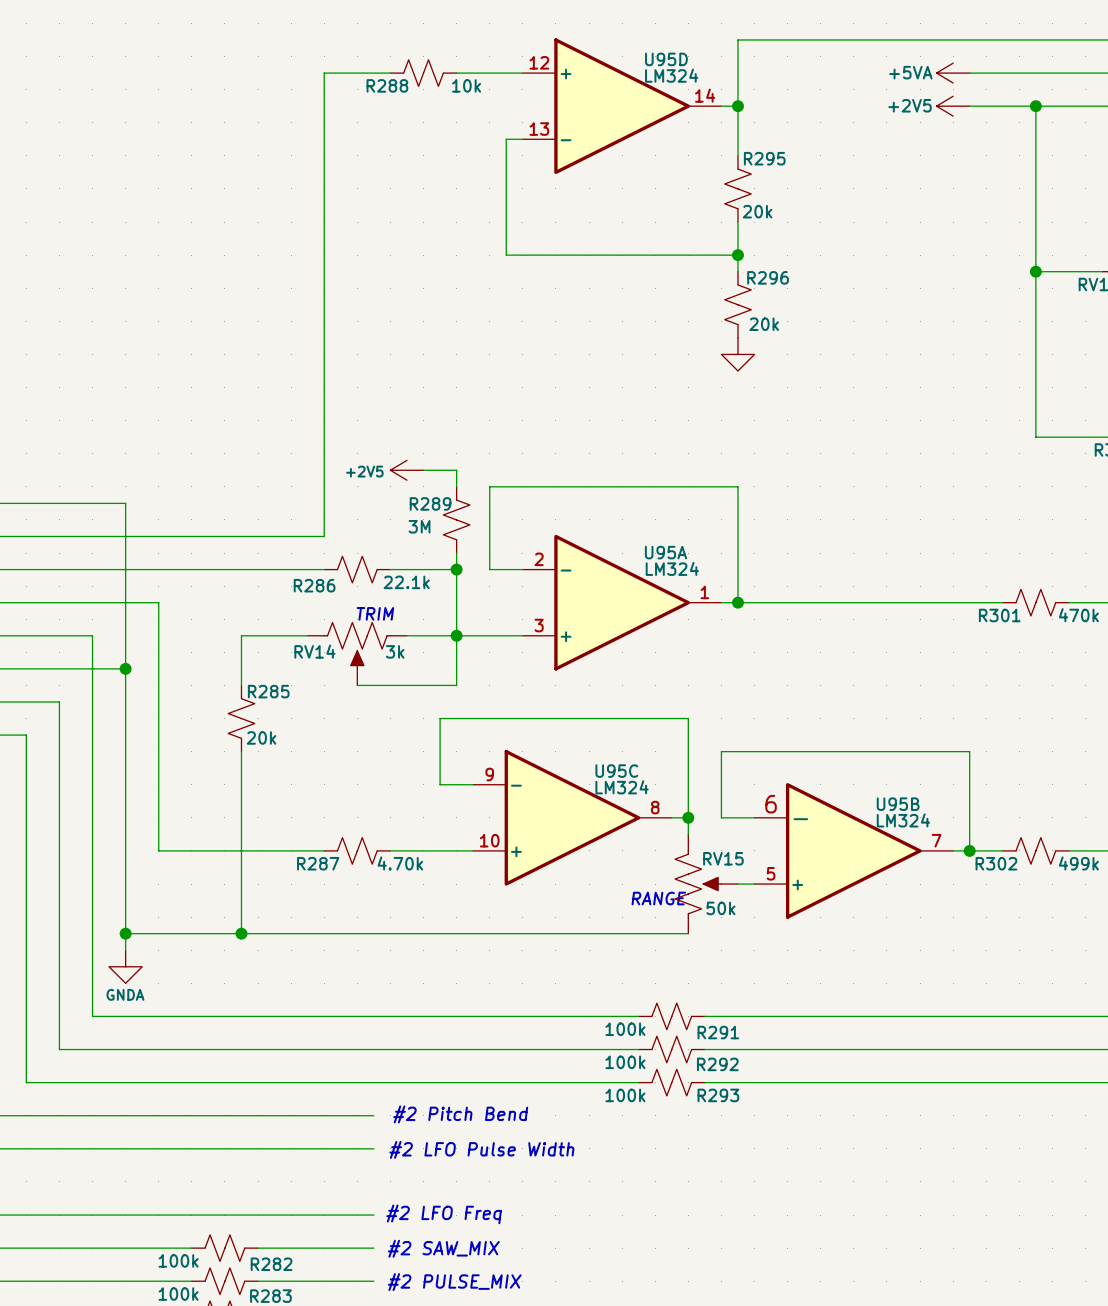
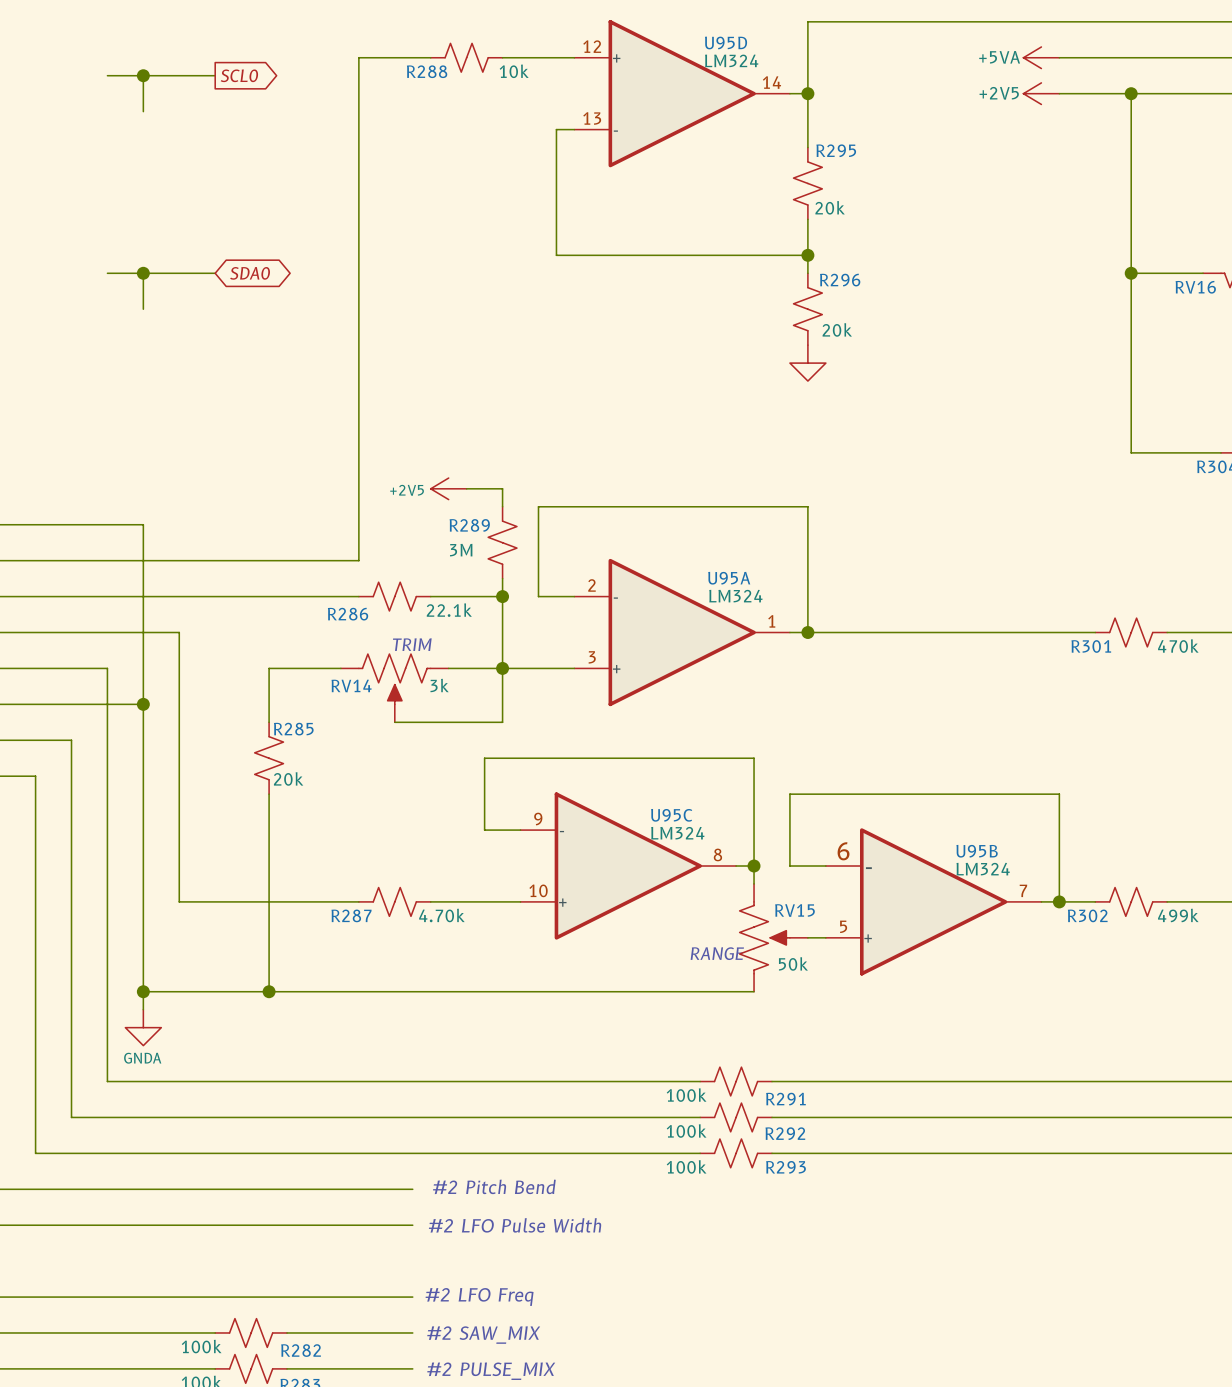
wire: none -> (107, 75) (215, 75)
wire: none -> (143, 75) (143, 111)
junction: none -> (143, 75)
global label: none -> SCL0 (239, 75)
wire: none -> (107, 273) (215, 273)
wire: none -> (143, 273) (143, 309)
junction: none -> (143, 273)
global label: none -> SDA0 (250, 273)

